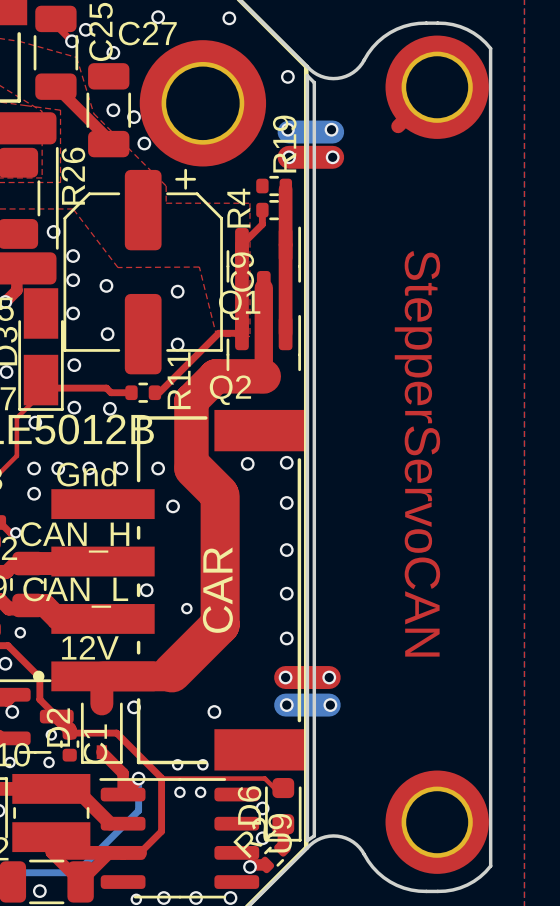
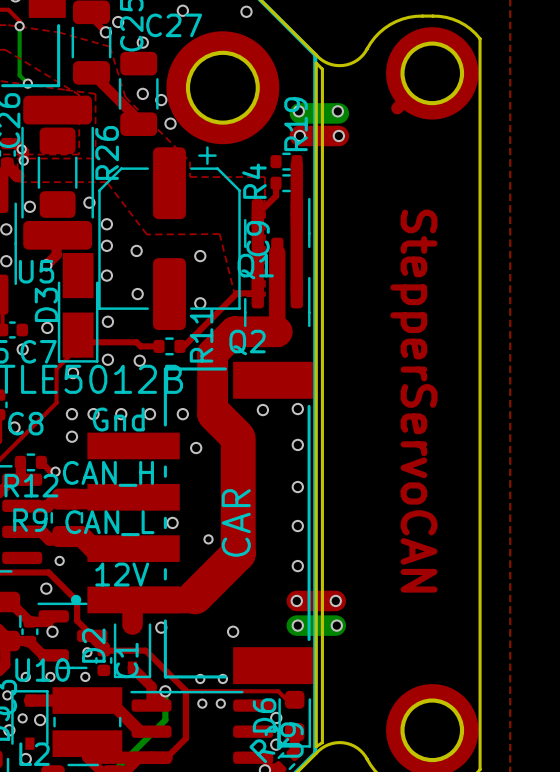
via: (287, 76) -> none

